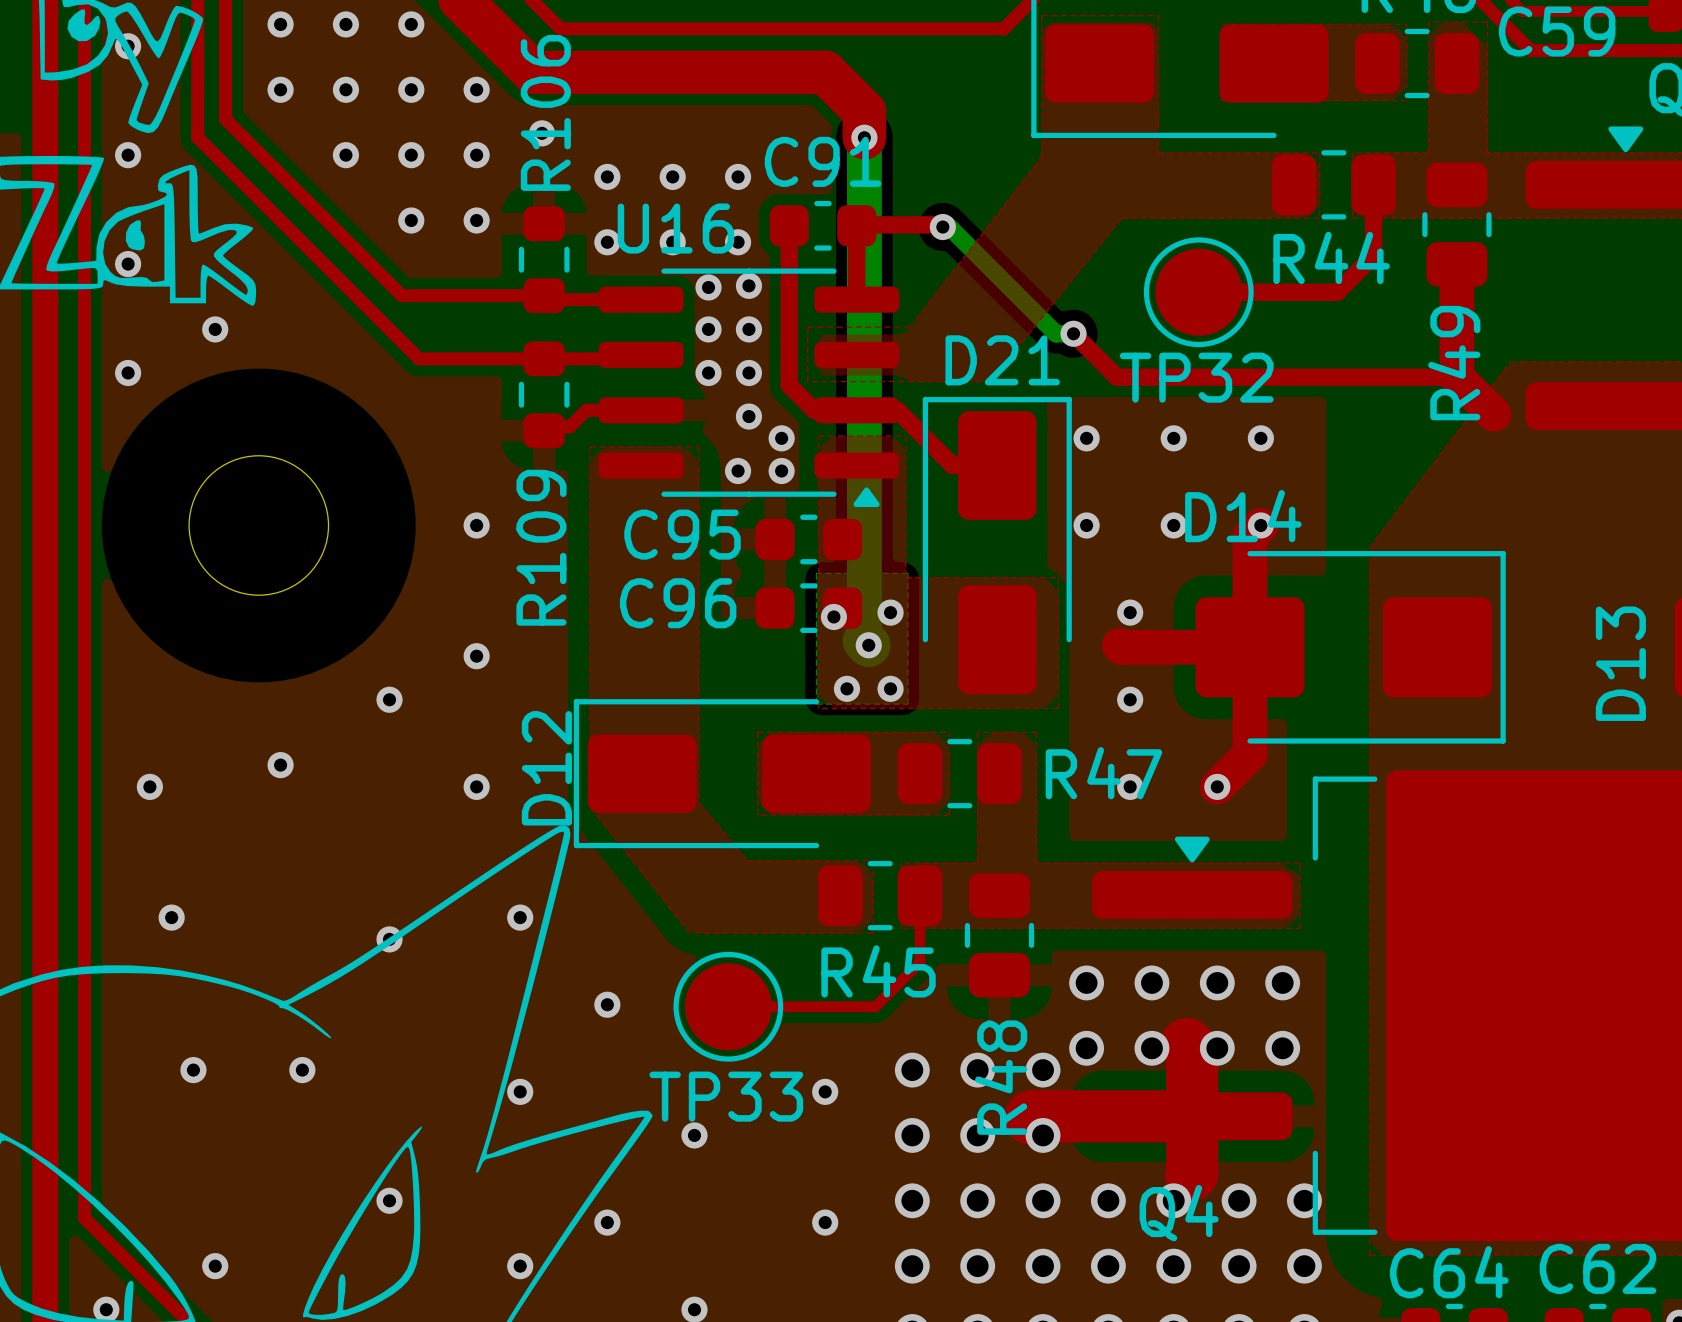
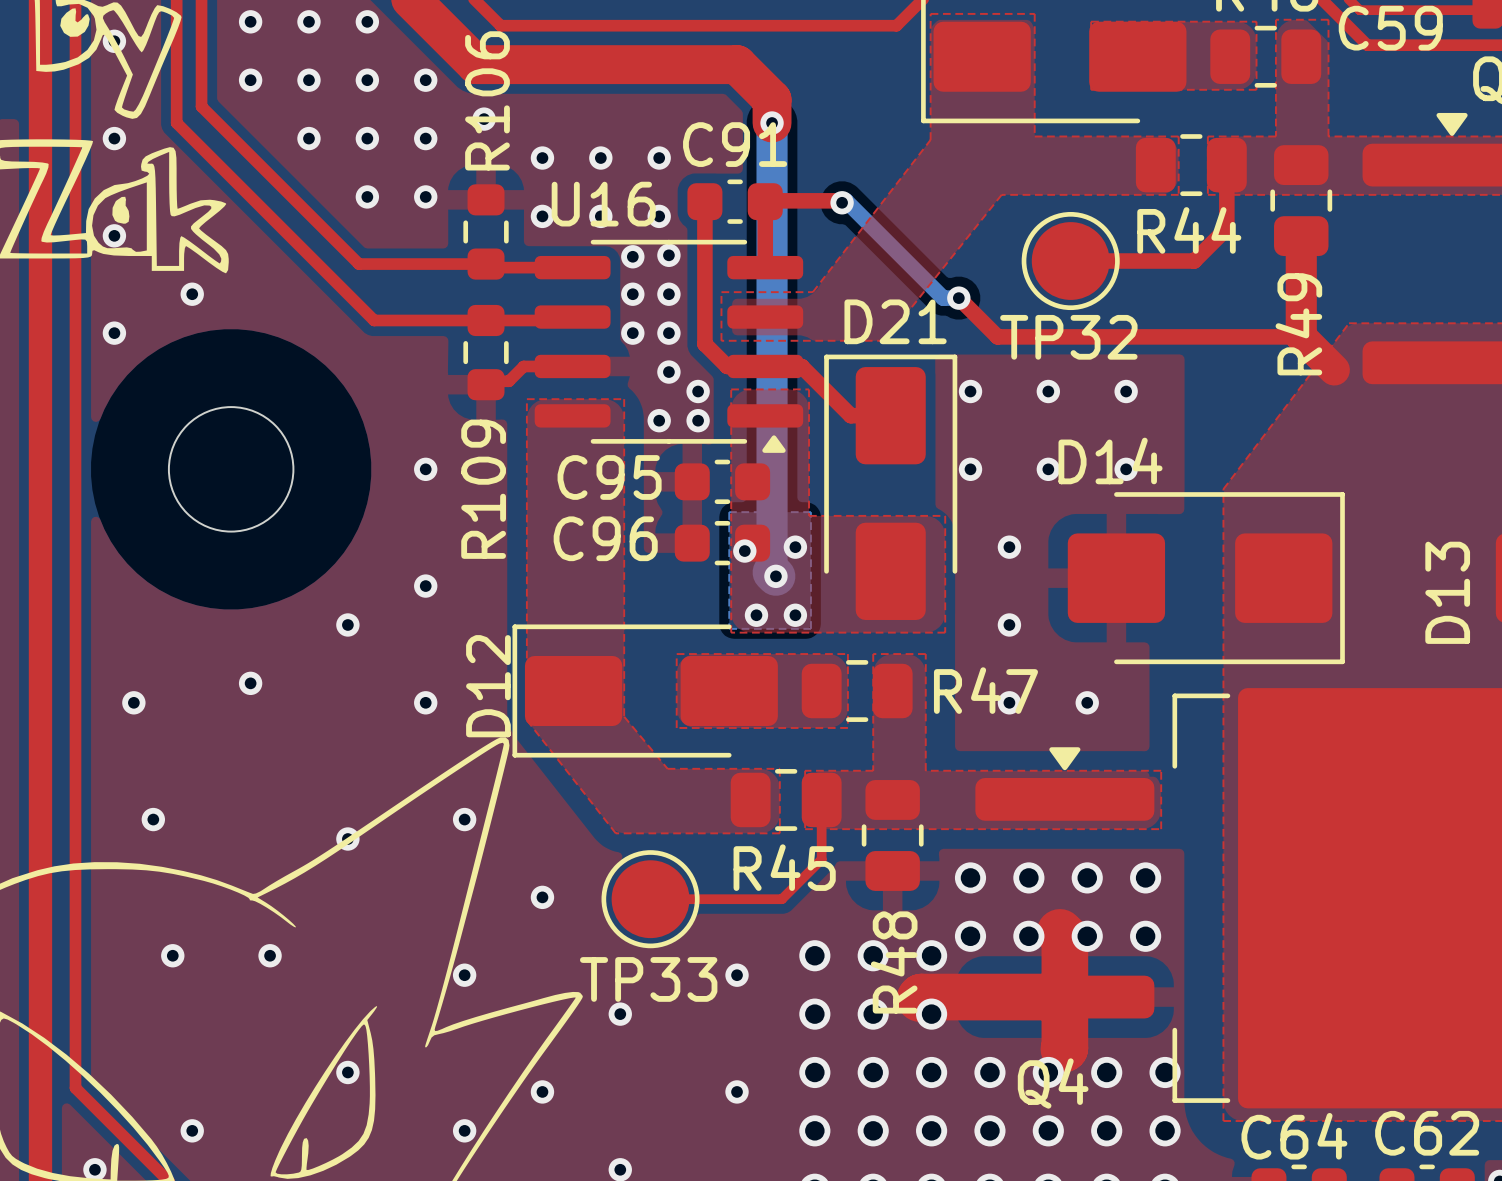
top track: (1260, 525) (1249, 536) (1249, 754) (1217, 786) -> none
top track: (1119, 645) (1121, 647) (1249, 647) -> none

